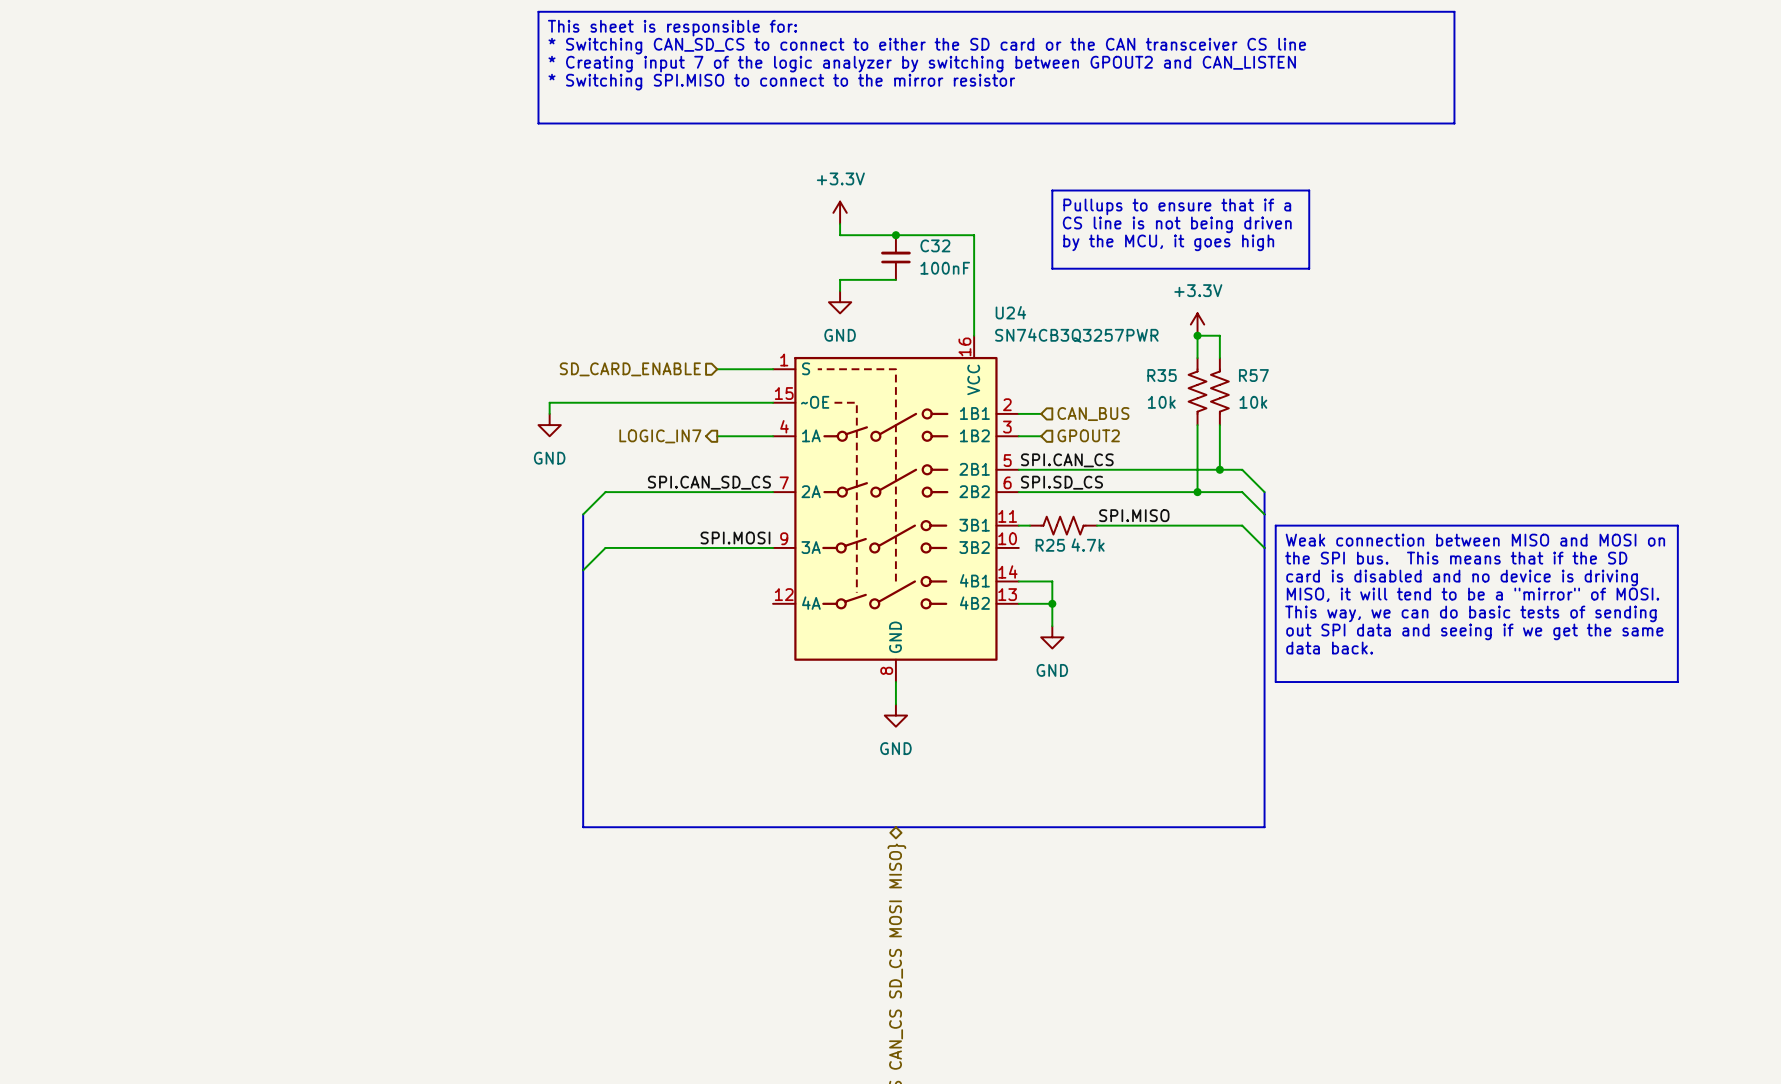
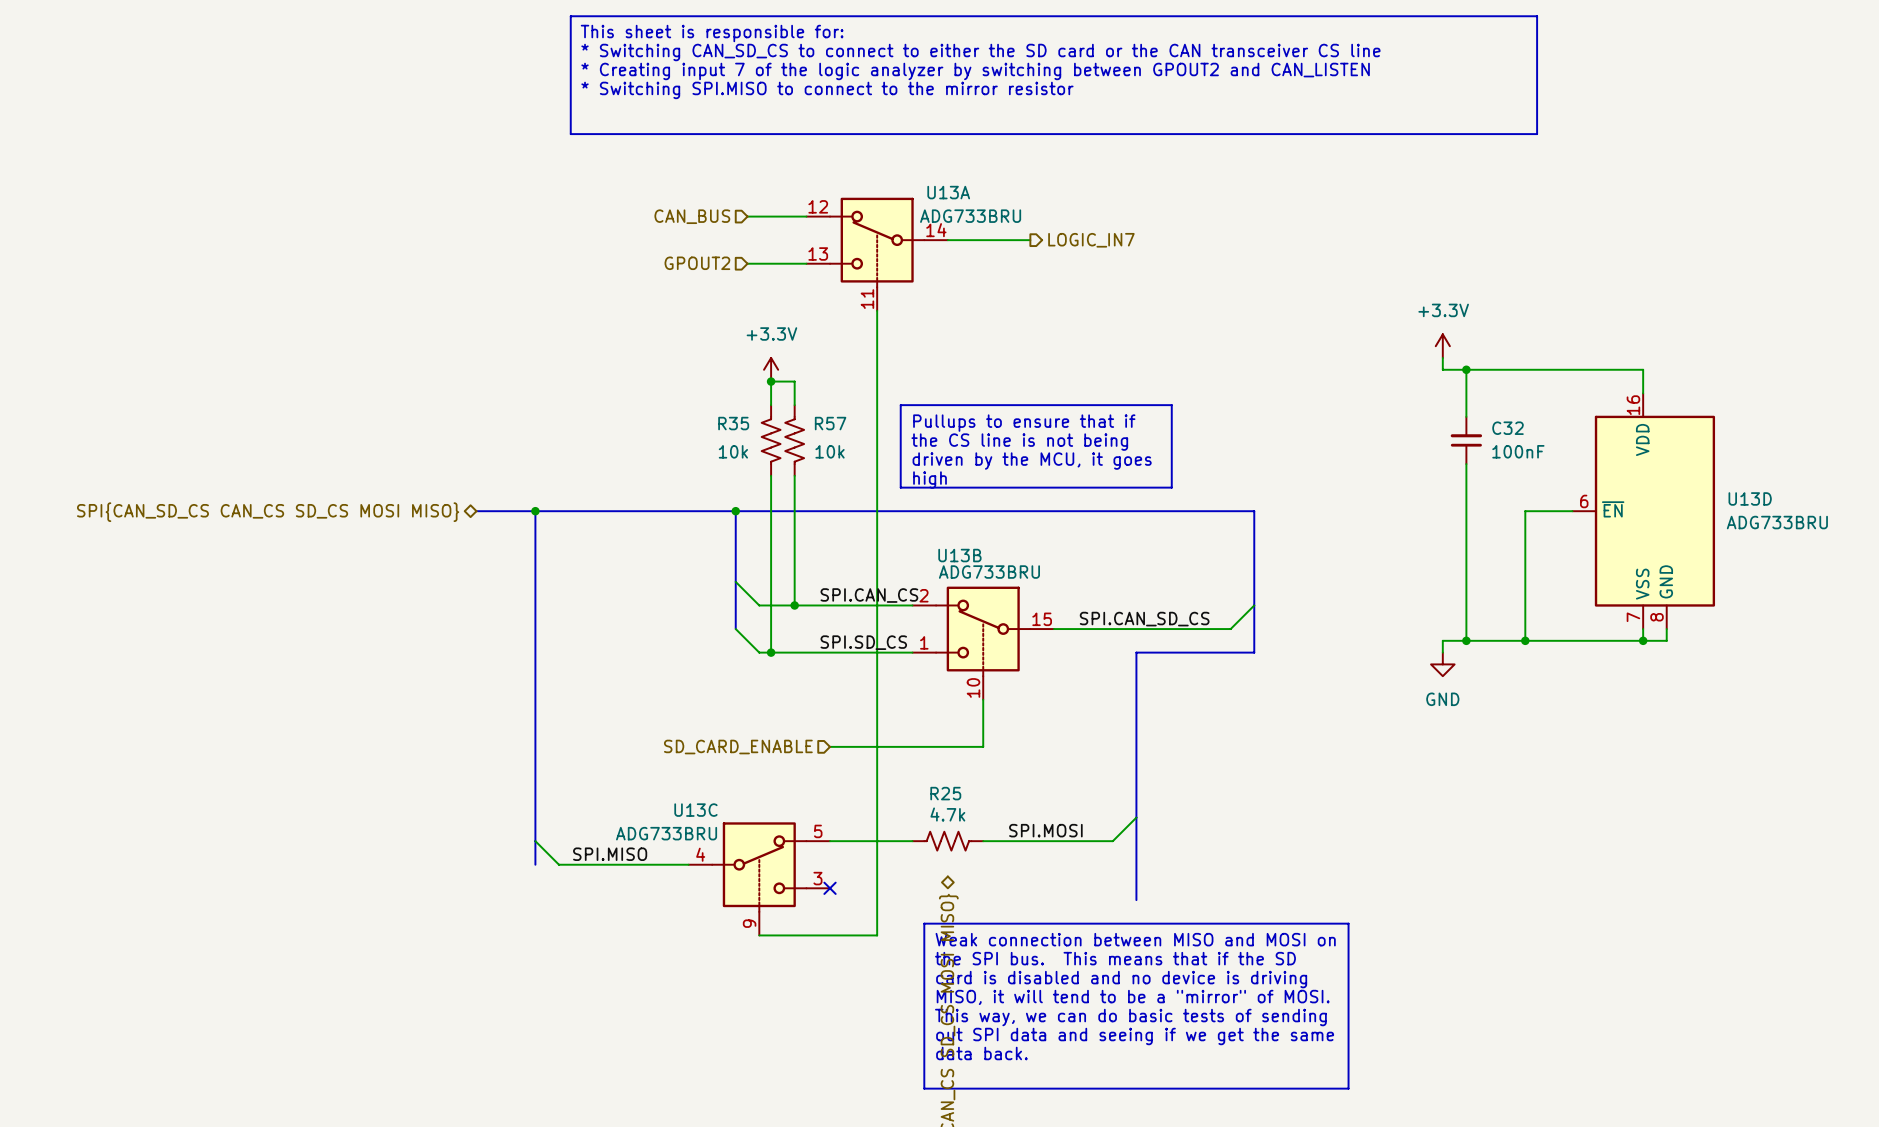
line: (1052, 190) (1309, 190) (1309, 268) (1052, 268) (1052, 190) -> none
hierarchical label: none -> CAN_BUS (692, 216)
wire: none -> (747, 216) (806, 216)
text: Pullups to ensure that if a (1177, 206) -> none
power symbol position: +3.3V (840, 212) -> +3.3V (771, 369)
wire: (840, 224) (840, 235) (974, 235) (974, 335) -> none
wire: none -> (947, 240) (1030, 240)
hierarchical label: none -> LOGIC_IN7 (1091, 240)
text: CS line is not being driven (1177, 224) -> none
junction: (895, 235) -> none
U13A: none -> ADG733BRU (877, 254)
text: by the MCU, it goes high (1168, 242) -> none
hierarchical label: none -> GPOUT2 (697, 263)
C32 position: (895, 257) -> (1466, 440)
wire: (895, 279) (840, 279) (840, 291) -> none
wire: none -> (877, 310) (877, 935) (759, 935)
power symbol: GND (840, 302) -> none
power symbol position: +3.3V (1197, 324) -> +3.3V (1442, 346)
junction: (1197, 335) -> none
wire: none -> (1442, 357) (1442, 369) (1643, 369) (1643, 393)
junction: none -> (1466, 369)
junction: none -> (771, 381)
wire: (1197, 358) (1197, 335) (1219, 335) (1219, 358) -> none
hierarchical label: SD_CARD_ENABLE (630, 369) -> none
wire: (717, 369) (773, 369) -> (747, 263) (806, 263)
wire: none -> (771, 405) (771, 381) (794, 381) (794, 405)
line: none -> (900, 405) (1171, 405) (1171, 487) (900, 487) (900, 405)
R35 position: (1197, 391) -> (771, 440)
R57 position: (1219, 391) -> (794, 440)
text: none -> Pullups to ensure that if (1024, 423)
wire: (773, 402) (549, 402) (549, 413) -> none
wire: (1018, 413) (1041, 413) -> none
hierarchical label: CAN_BUS (1093, 414) -> none
text: none -> the CS line is not being (1019, 442)
power symbol: GND (549, 425) -> none
wire: (1197, 425) (1197, 492) -> none
wire: (1219, 425) (1219, 469) -> (1466, 369) (1466, 416)
text: none -> driven by the MCU, it goes (1032, 461)
hierarchical label: GPOUT2 (1088, 435) -> none
hierarchical label: LOGIC_IN7 (660, 436) -> none
wire: (717, 436) (773, 436) -> none
wire: (1018, 436) (1041, 436) -> none
wire: none -> (1466, 464) (1466, 640)
wire: none -> (771, 475) (771, 652)
wire: none -> (794, 475) (794, 605)
text: none -> high (930, 480)
label: SPI.CAN_CS (1067, 460) -> none
wire: (1018, 469) (1242, 469) (1264, 492) -> none
junction: (1219, 469) -> none
bus: none -> (476, 511) (1254, 511) (1254, 652) (1136, 652) (1136, 900)
bus: none -> (535, 511) (535, 864)
junction: none -> (535, 511)
bus: none -> (735, 511) (735, 629)
junction: none -> (735, 511)
wire: none -> (1572, 511) (1525, 511) (1525, 640)
U13D: none -> ADG733BRU (1643, 511)
hierarchical label: none -> SPI{CAN_SD_CS CAN_CS SD_CS MOSI MISO} (268, 512)
label: SPI.CAN_SD_CS (709, 482) -> none
label: SPI.SD_CS (1061, 482) -> none
wire: (773, 492) (605, 492) (583, 514) -> none
wire: (1018, 492) (1242, 492) (1264, 514) -> none
junction: (1197, 492) -> none
bus: (1264, 492) (1264, 827) (583, 827) (583, 514) -> none
U24: SN74CB3Q3257PWR (895, 508) -> none
label: SPI.MISO (1134, 515) -> none
wire: (1018, 525) (1029, 525) -> none
R25 position: (1063, 525) -> (947, 841)
wire: (1097, 525) (1242, 525) (1264, 547) -> none
line: (1275, 525) (1677, 525) (1677, 682) (1275, 682) (1275, 525) -> none
label: SPI.MOSI (735, 537) -> none
text: Weak connection between MISO and MOSI on (1475, 540) -> none
R25 name position: R25 (1050, 545) -> R25 (945, 793)
R25 value position: 4.7k (1088, 545) -> 4.7k (947, 814)
wire: none -> (735, 581) (759, 605) (912, 605)
wire: (773, 547) (605, 547) (583, 570) -> none
text: the SPI bus. This means that if the SD (1456, 558) -> none
label: none -> SPI.CAN_CS (869, 595)
junction: none -> (794, 605)
wire: none -> (1254, 605) (1230, 629) (1053, 629)
text: card is disabled and no device is driving (1462, 577) -> none
wire: (1018, 581) (1052, 581) (1052, 626) -> none
label: none -> SPI.CAN_SD_CS (1144, 619)
wire: none -> (735, 629) (759, 652) (912, 652)
wire: none -> (1643, 629) (1643, 640)
wire: none -> (1666, 629) (1666, 640) (1442, 640) (1442, 652)
text: MISO, it will tend to be a "mirror" of MOSI. (1473, 594) -> none
wire: (1018, 603) (1052, 603) -> none
junction: (1052, 603) -> none
junction: none -> (1466, 640)
junction: none -> (1525, 640)
junction: none -> (1643, 640)
label: none -> SPI.SD_CS (863, 642)
U13B: none -> ADG733BRU (983, 643)
text: This way, we can do basic tests of sending (1470, 613) -> none
junction: none -> (771, 652)
power symbol: none -> GND (1442, 664)
text: out SPI data and seeing if we get the same (1474, 631) -> none
power symbol: GND (1052, 637) -> none
text: data back. (1329, 648) -> none
wire: none -> (983, 699) (983, 746) (830, 746)
wire: (895, 682) (895, 704) -> none
hierarchical label: none -> SD_CARD_ENABLE (738, 747)
power symbol: GND (895, 715) -> none
wire: none -> (1136, 817) (1112, 841) (983, 841)
label: none -> SPI.MOSI (1045, 830)
wire: none -> (535, 841) (558, 864) (688, 864)
wire: none -> (830, 841) (912, 841)
label: none -> SPI.MISO (610, 854)
U13C: none -> ADG733BRU (759, 878)
no-connect mark: none -> (830, 888)
line: none -> (924, 923) (1348, 923) (1348, 1088) (924, 1088) (924, 923)
text: none -> Weak connection between MISO and MOSI on (1135, 939)
text: none -> the SPI bus. This means that if the SD (1115, 958)
text: none -> card is disabled and no device is driving (1121, 979)
text: none -> MISO, it will tend to be a "mirror" of MOSI. (1133, 997)
text: none -> This way, we can do basic tests of sending (1130, 1017)
text: none -> out SPI data and seeing if we get the same (1135, 1036)
text: none -> data back. (981, 1053)

